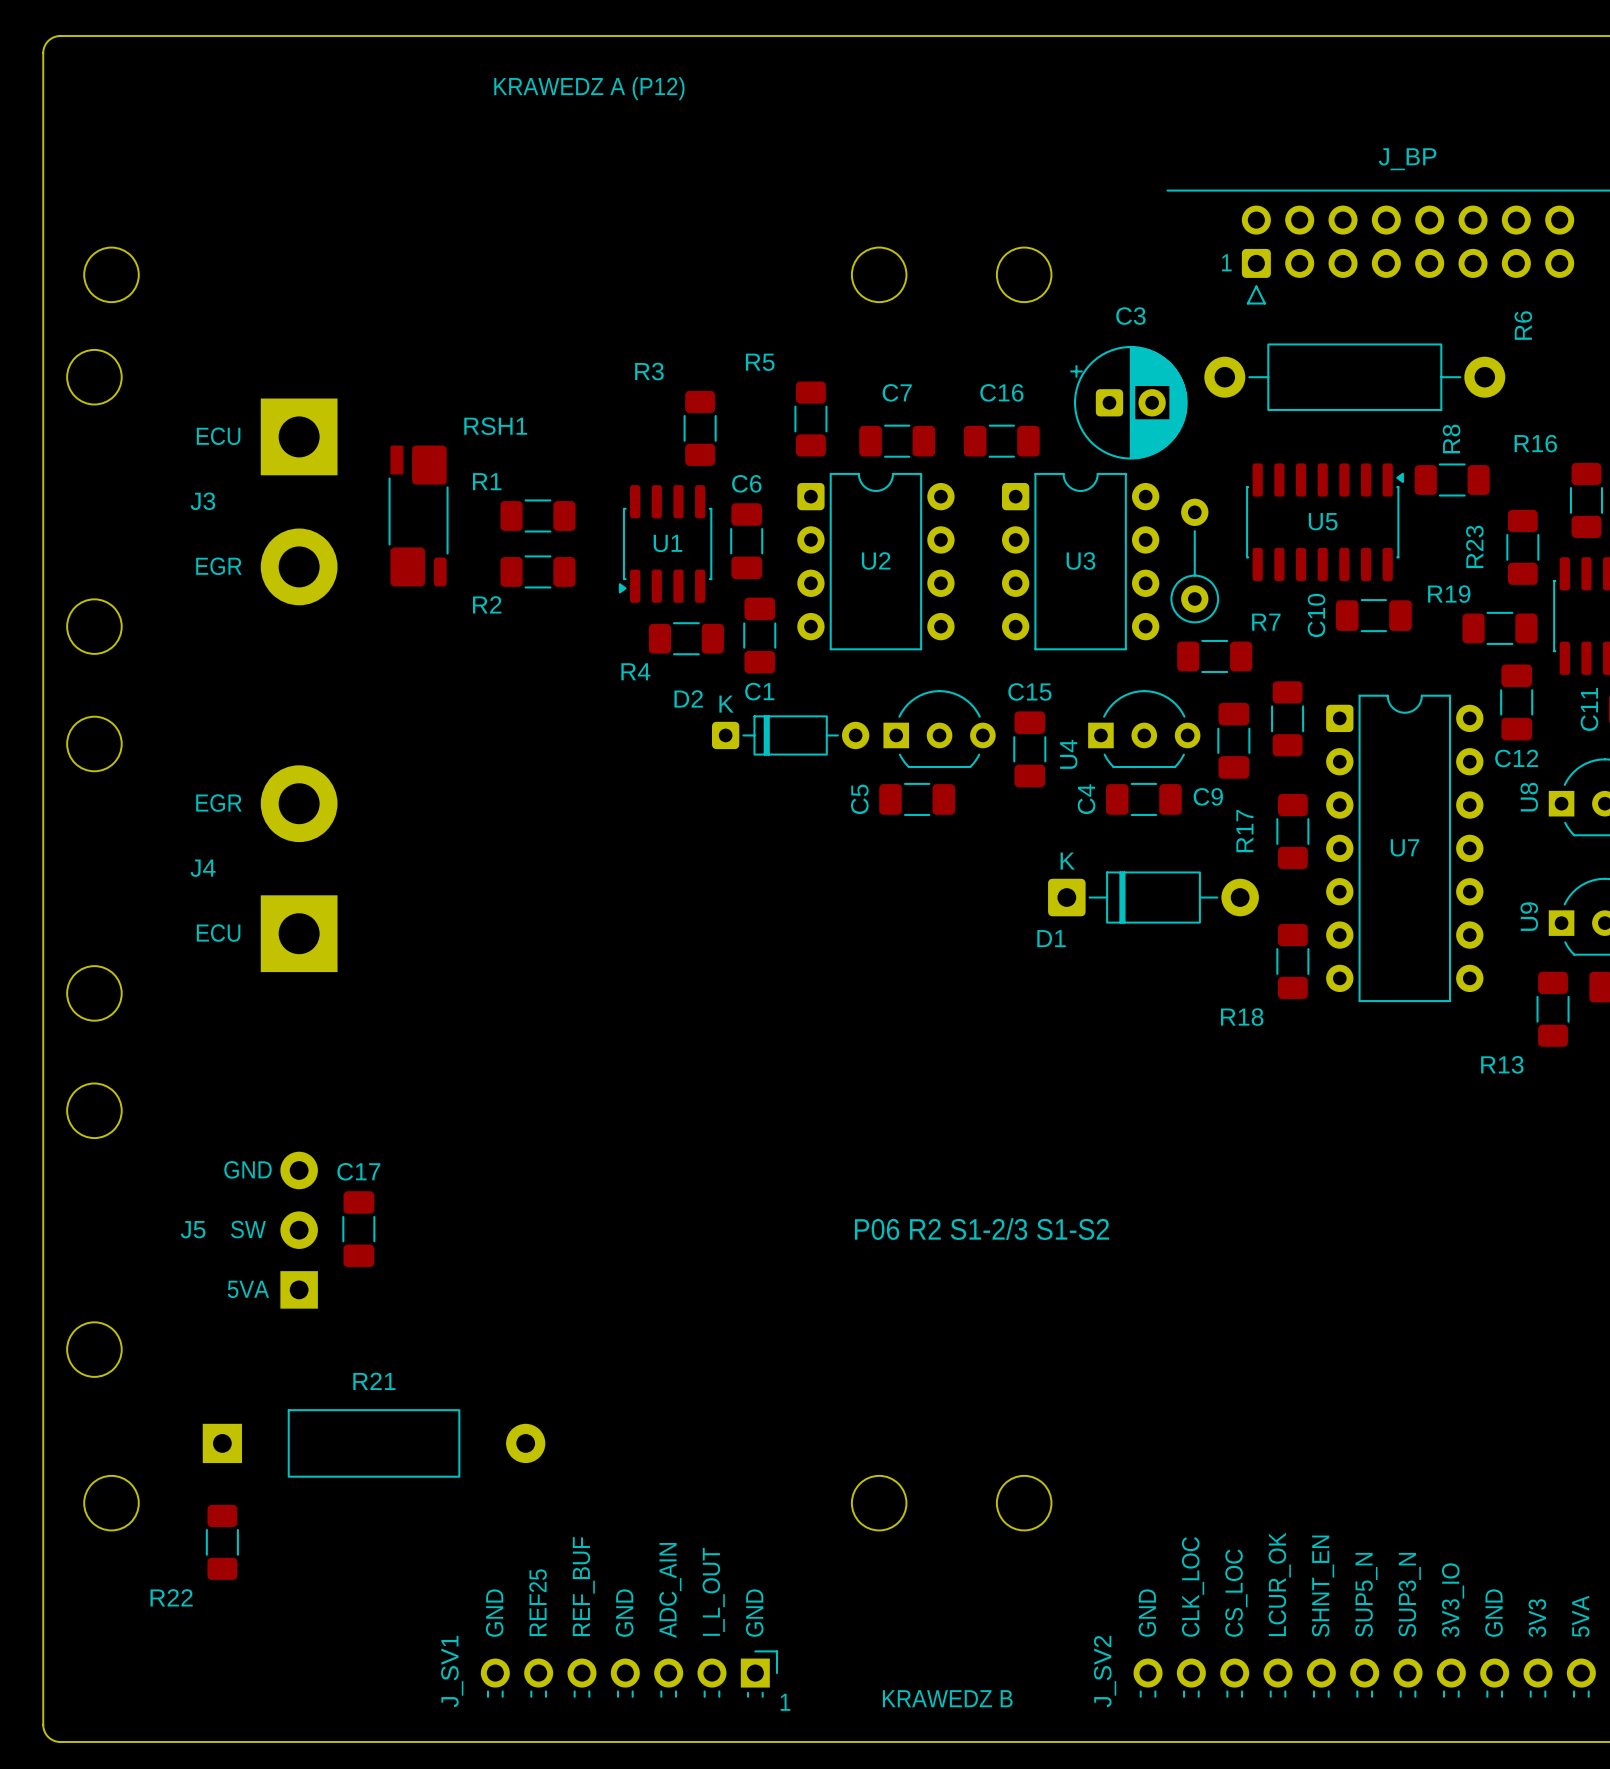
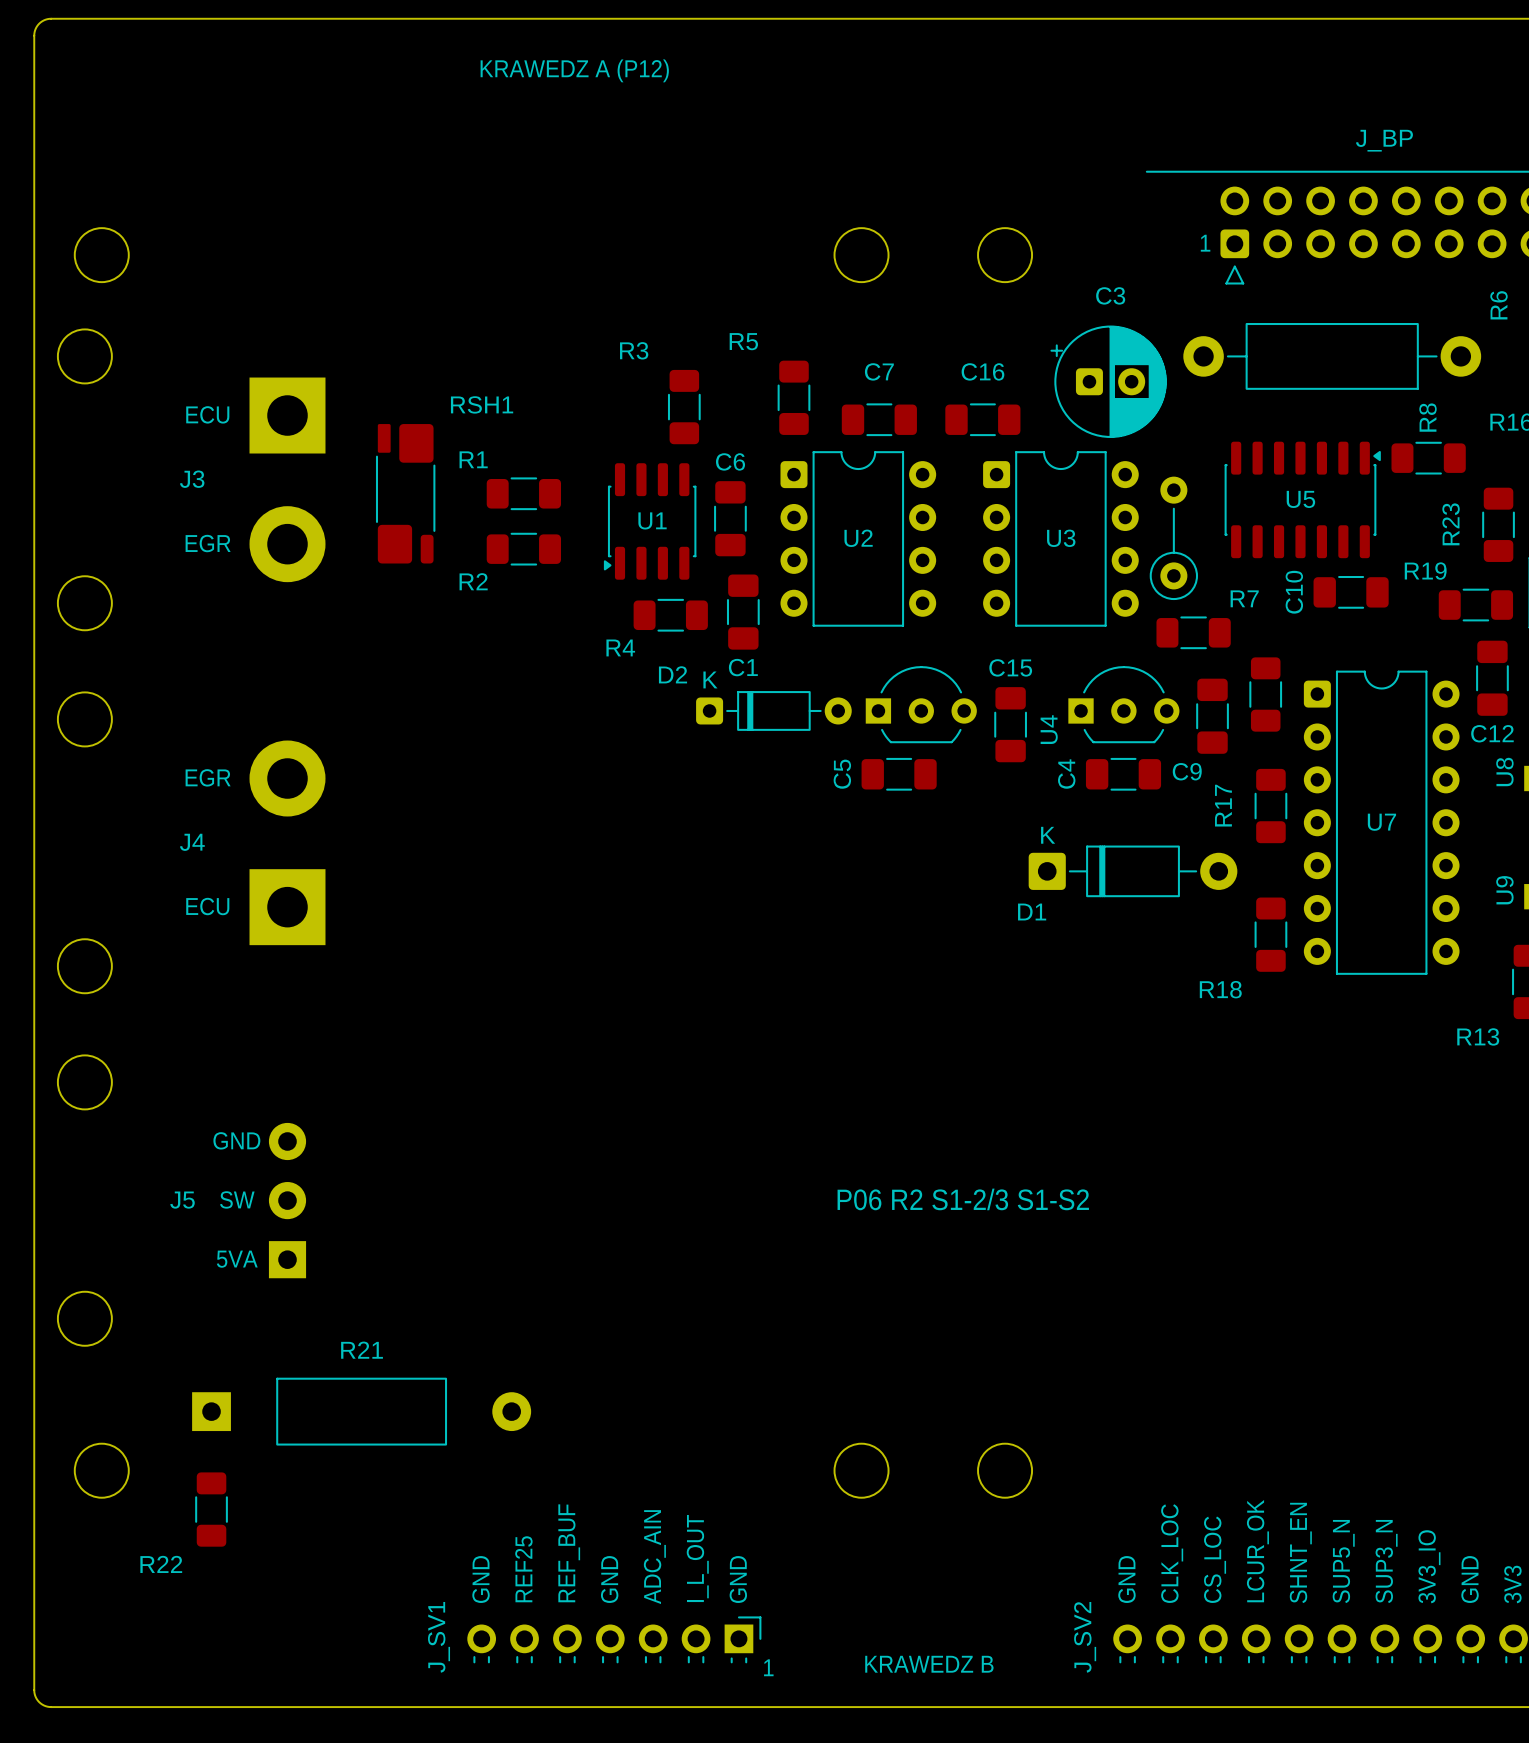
C17: (358, 1229) -> none

